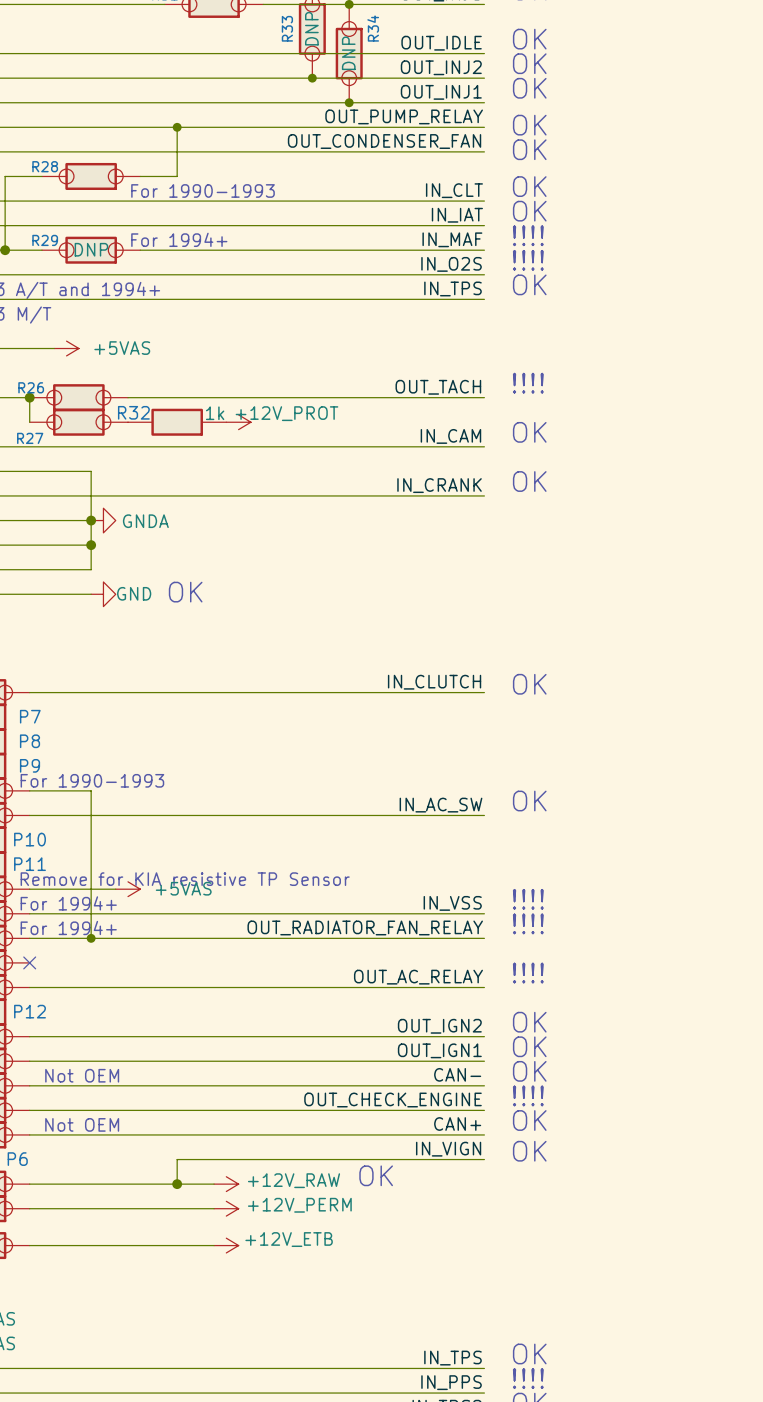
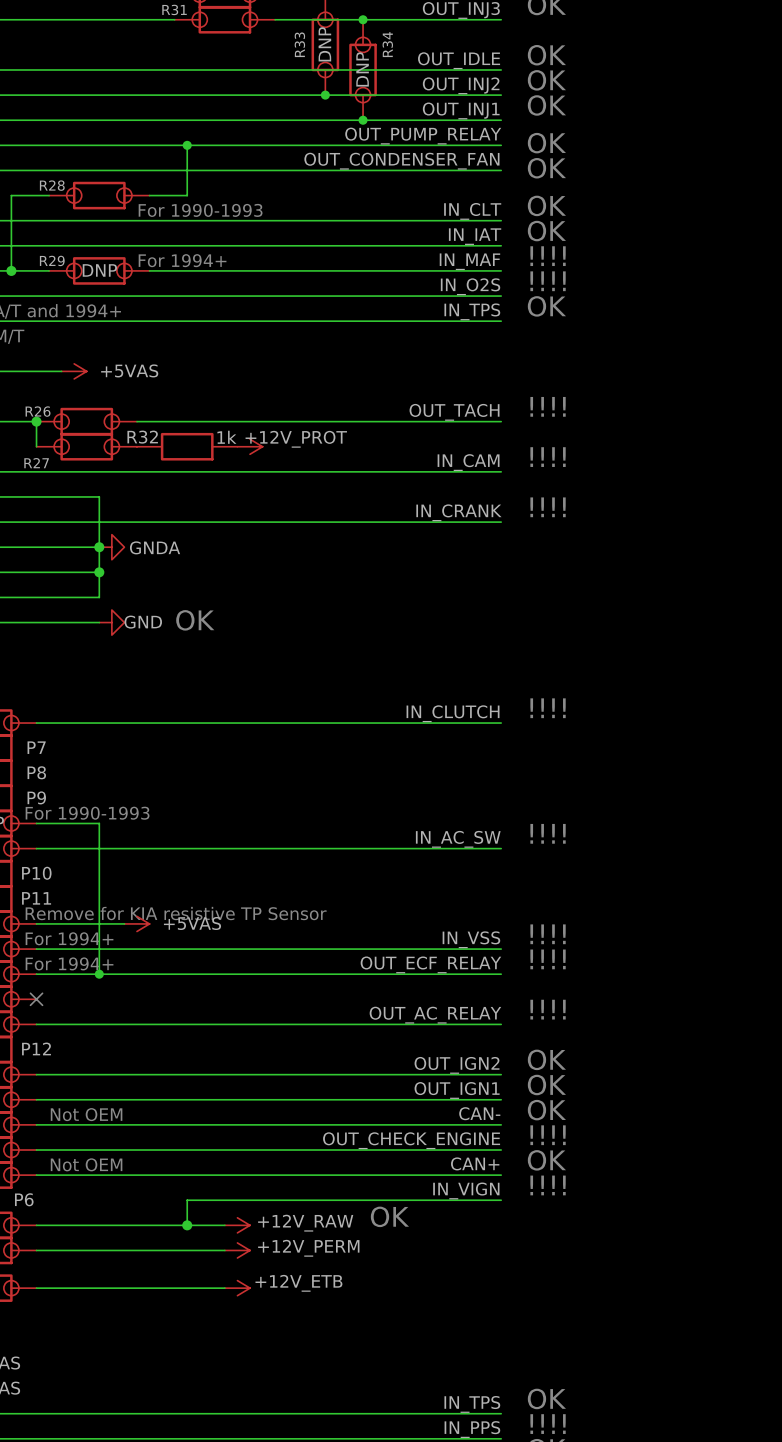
text: OK (529, 432) -> !!!! (548, 457)
text: OK (529, 481) -> !!!! (548, 507)
text: OK (529, 684) -> !!!! (548, 708)
text: OK (529, 801) -> !!!! (548, 833)
label: OUT_RADIATOR_FAN_RELAY (365, 927) -> OUT_ECF_RELAY (430, 964)
text: OK (529, 1151) -> !!!! (548, 1185)

